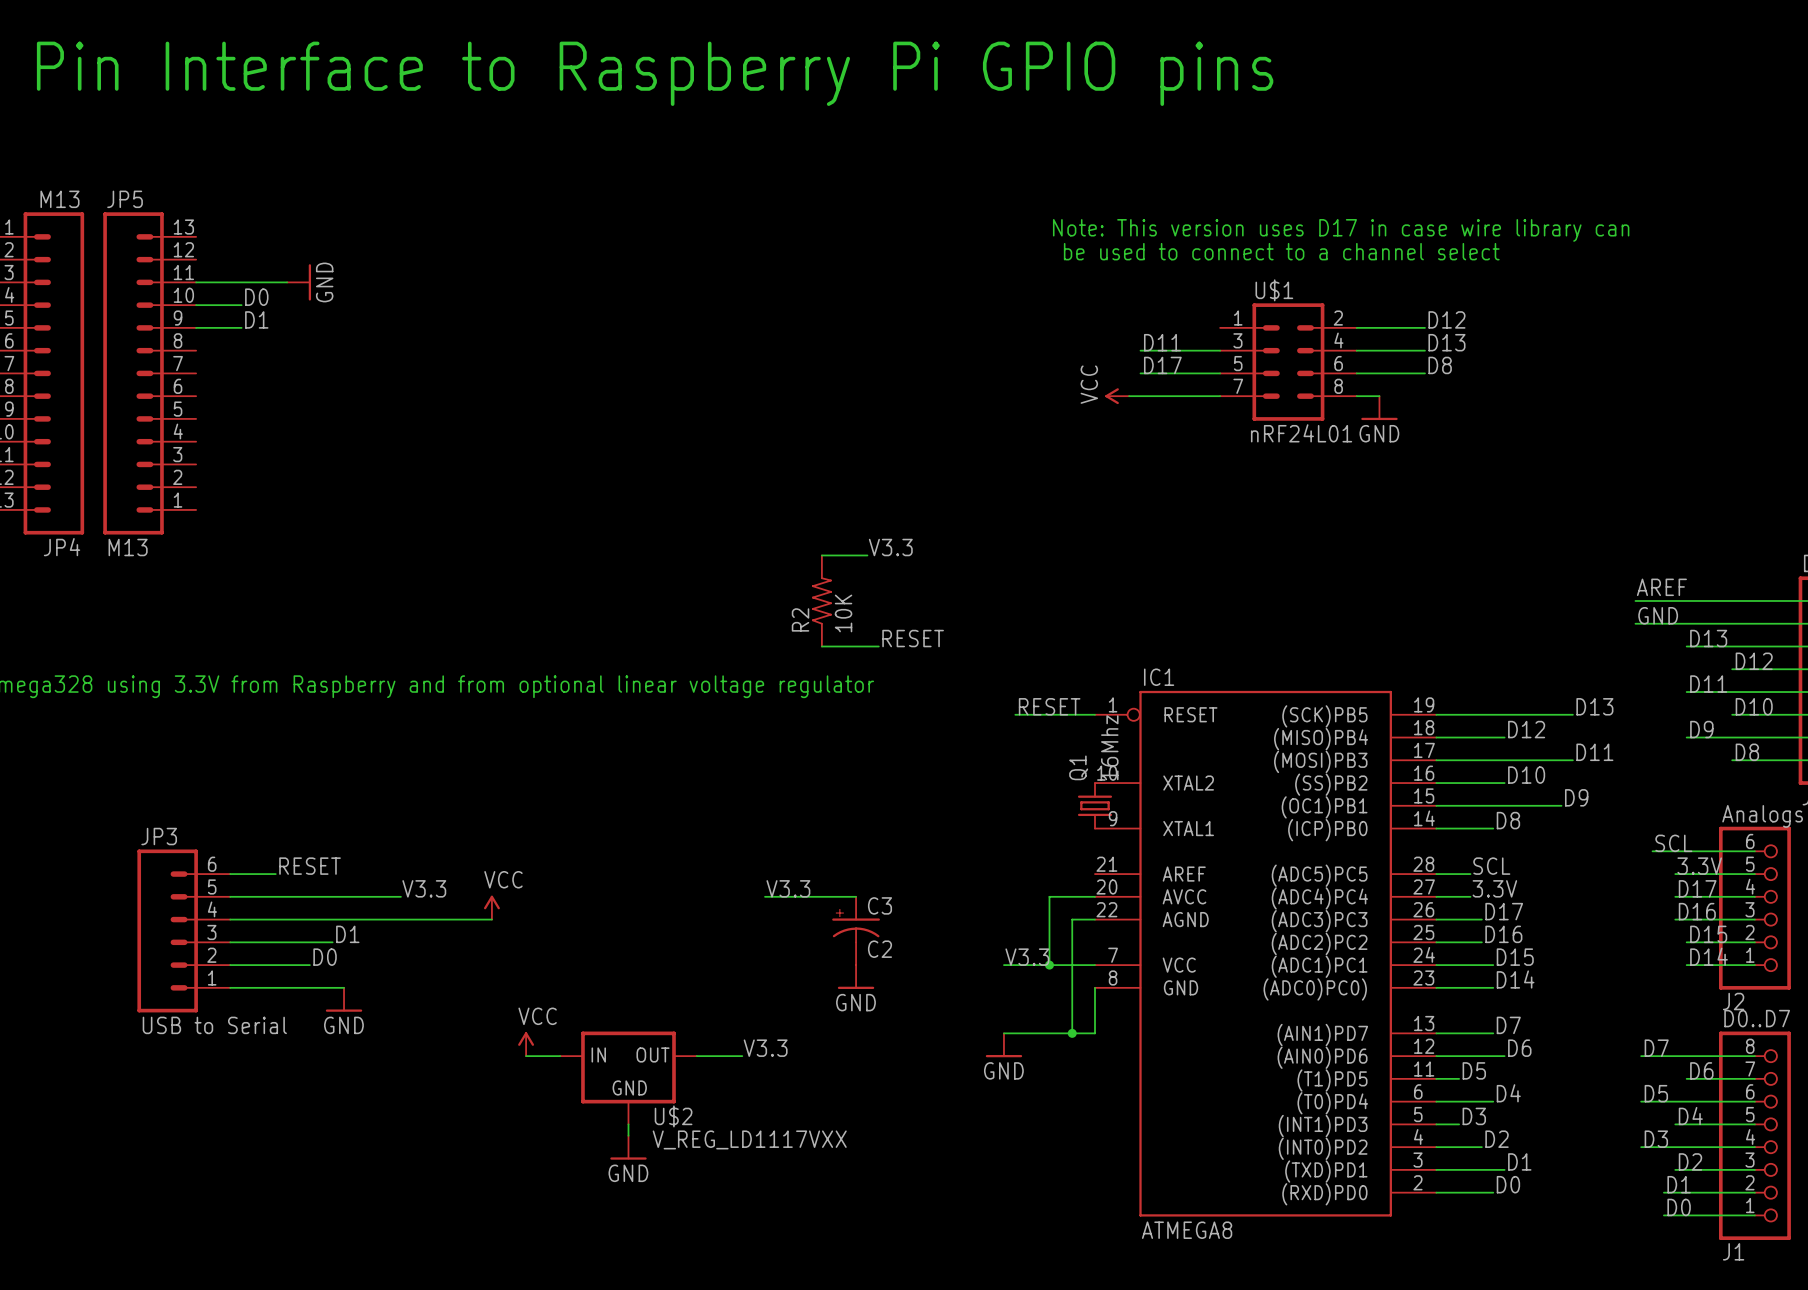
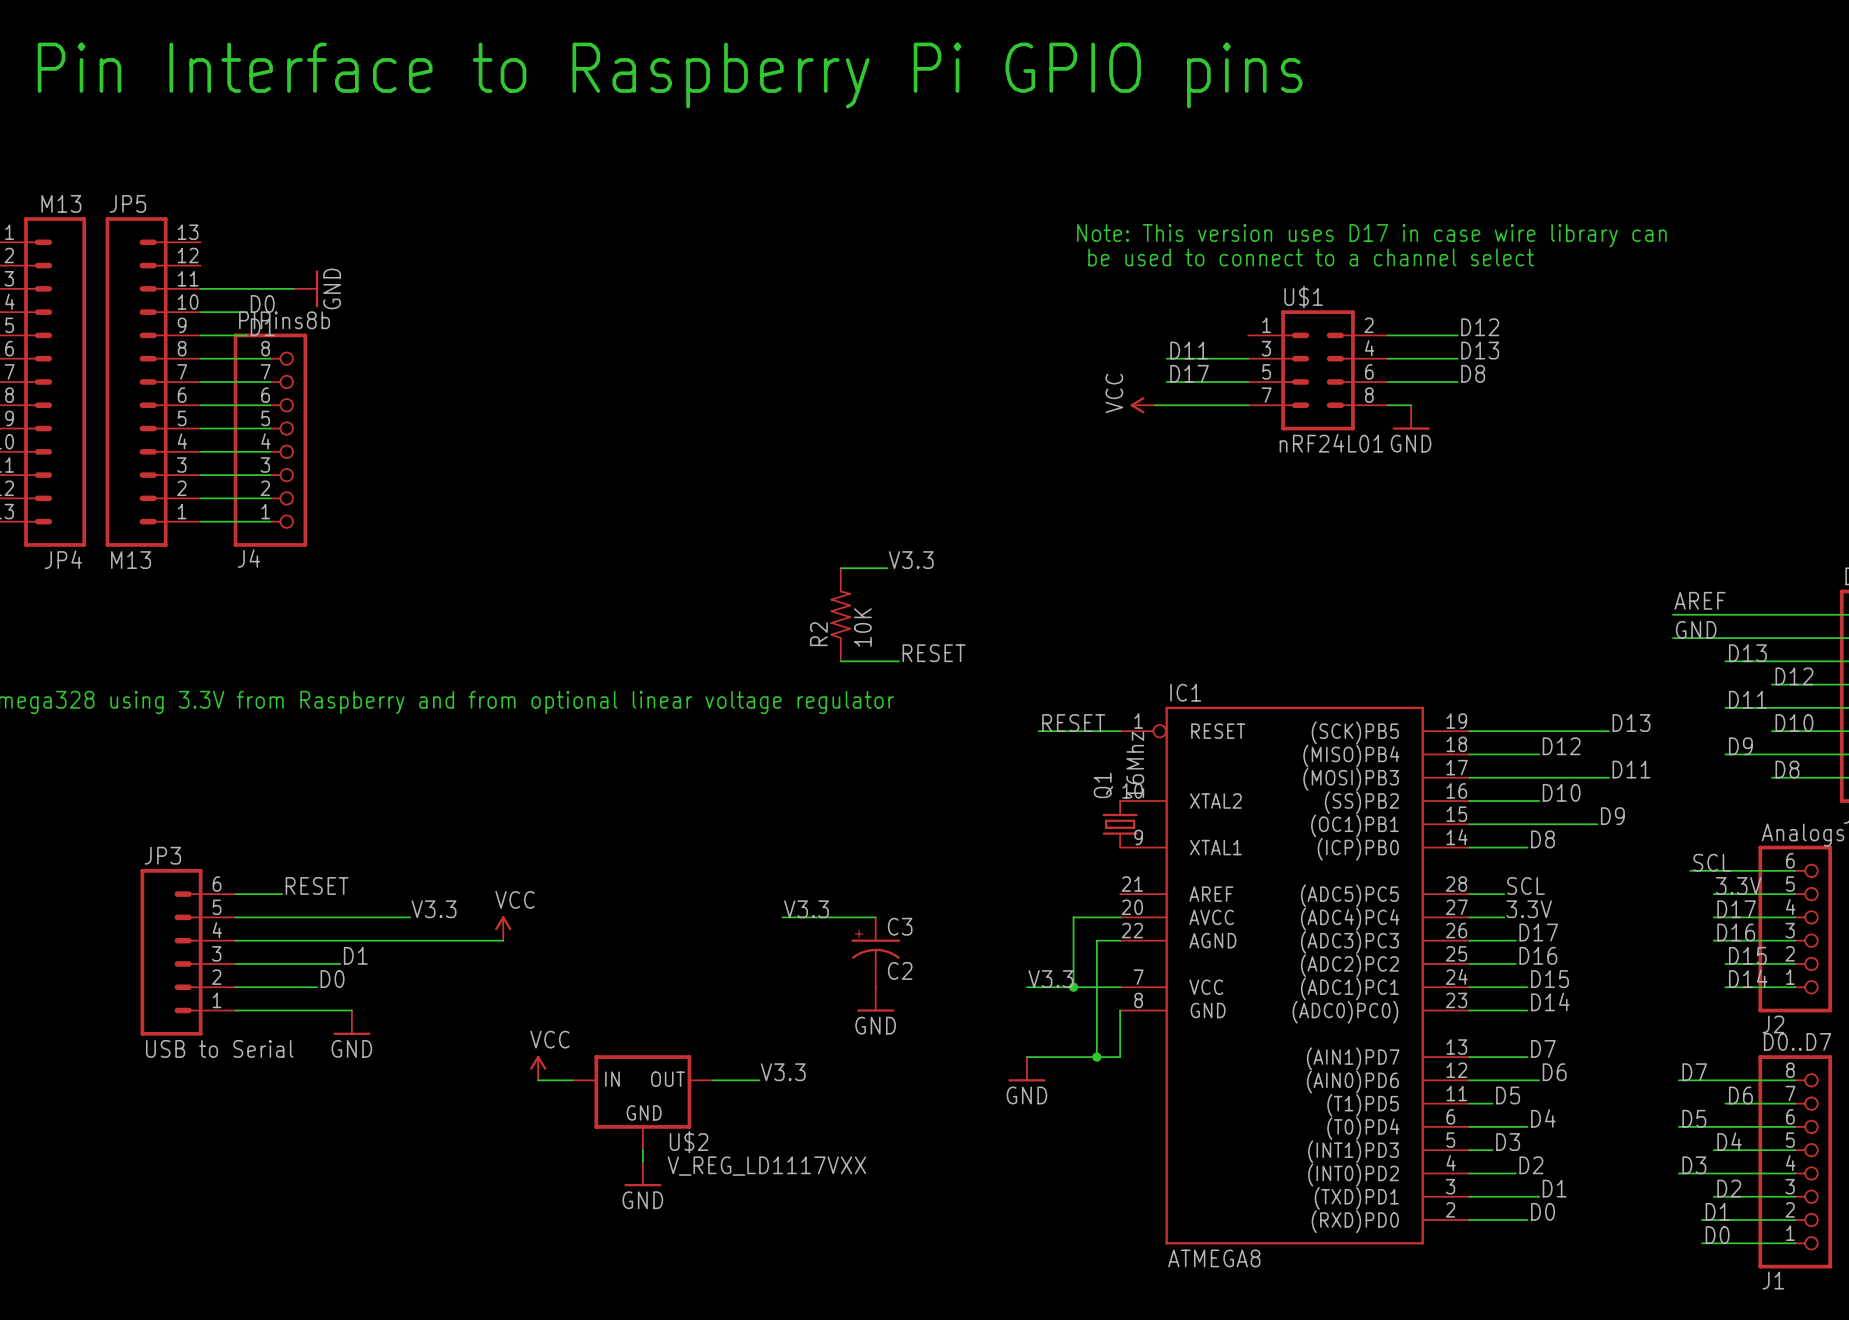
wire: none -> (200, 358) (270, 358)
wire: none -> (200, 381) (270, 381)
wire: none -> (200, 405) (270, 405)
wire: none -> (200, 428) (270, 428)
J4: none -> PIPins8b (270, 440)
wire: none -> (200, 451) (270, 451)
wire: none -> (200, 475) (270, 475)
wire: none -> (200, 498) (270, 498)
wire: none -> (200, 521) (270, 521)

